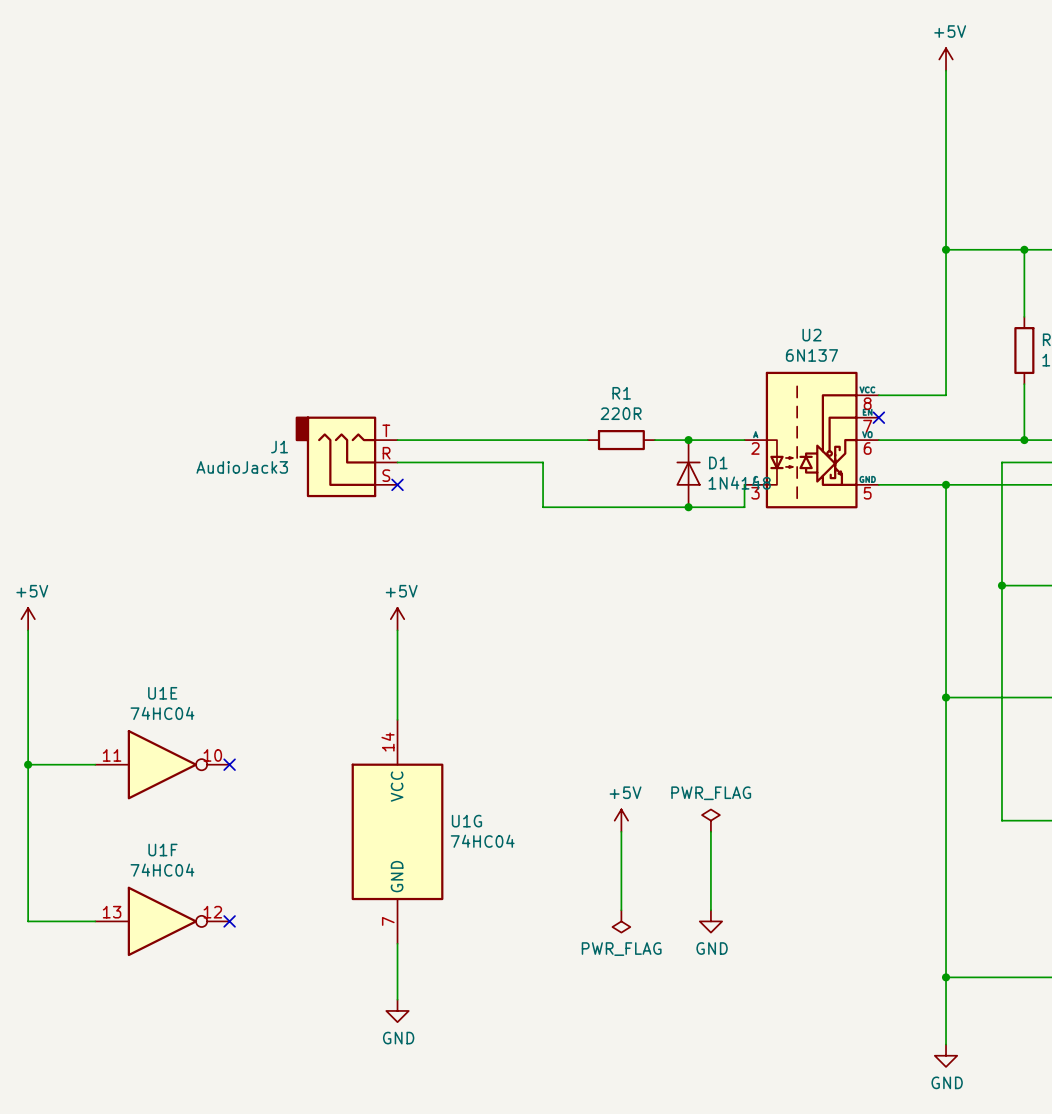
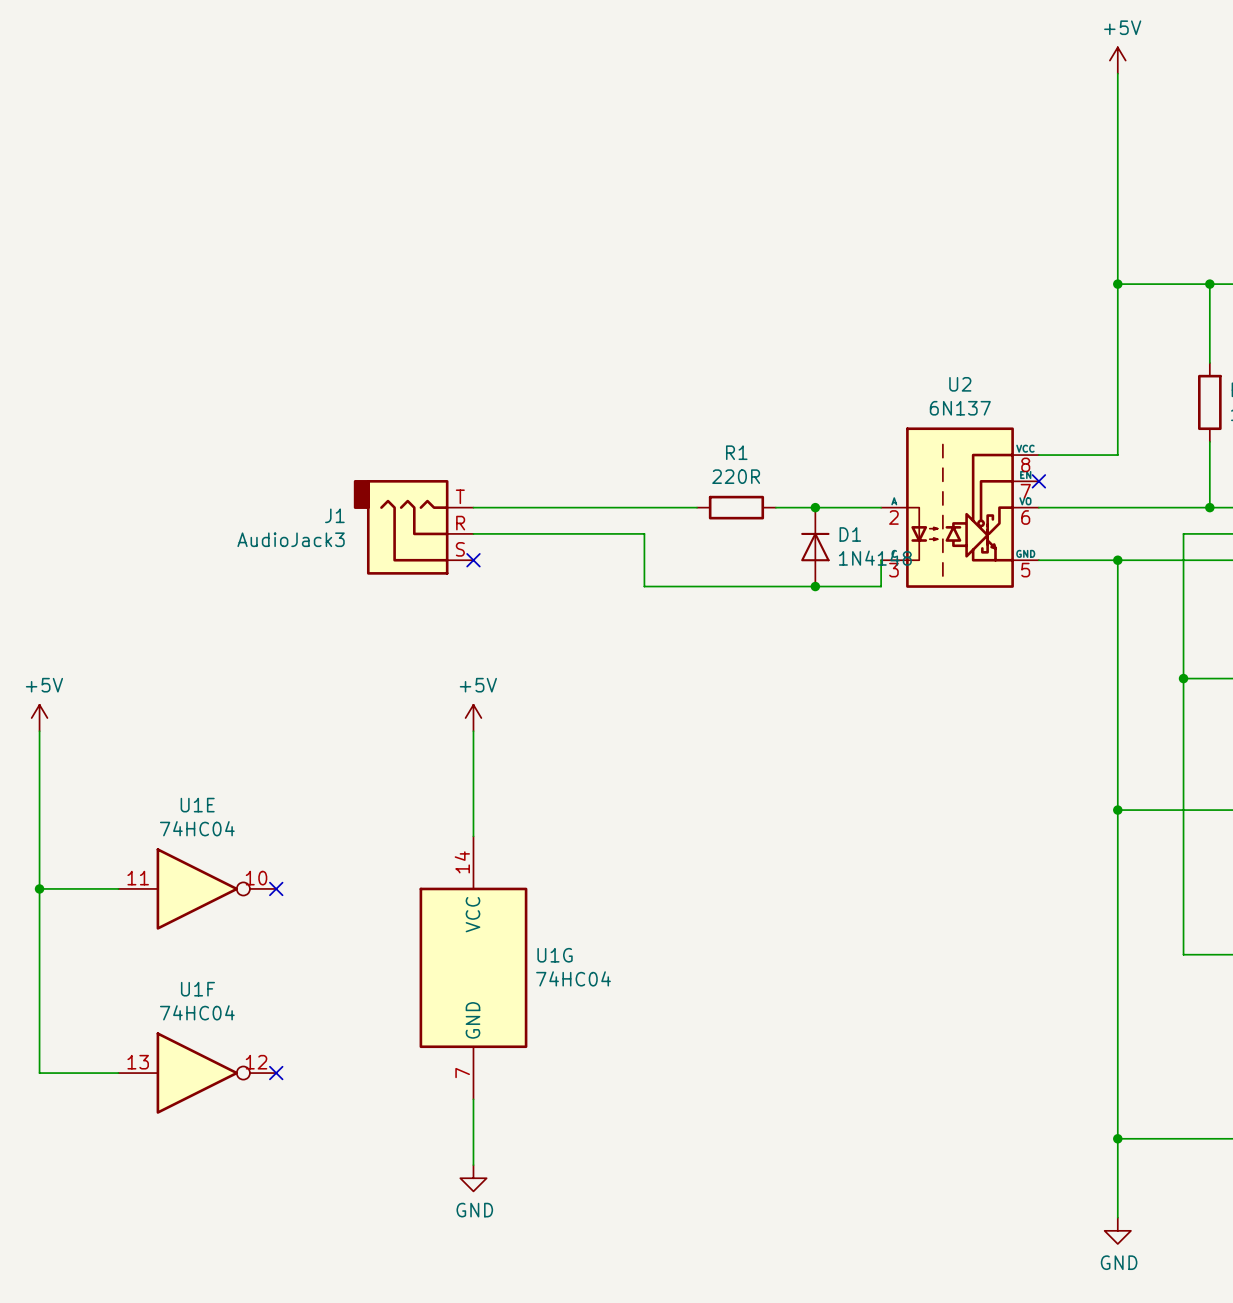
power symbol: +5V (621, 820) -> none
power symbol: PWR_FLAG (710, 820) -> none
wire: (621, 831) (621, 910) -> none
wire: (710, 831) (710, 910) -> none
power symbol: PWR_FLAG (621, 921) -> none
power symbol: GND (710, 921) -> none

